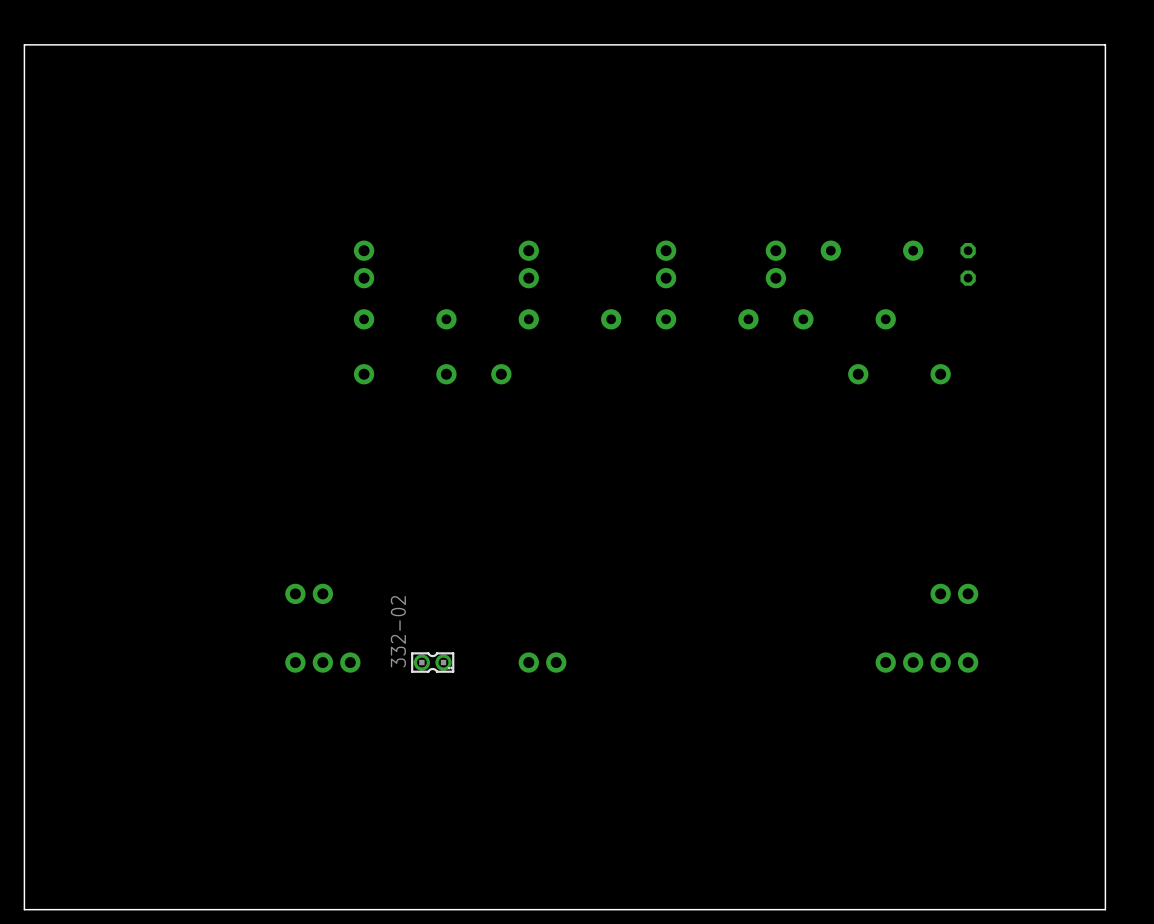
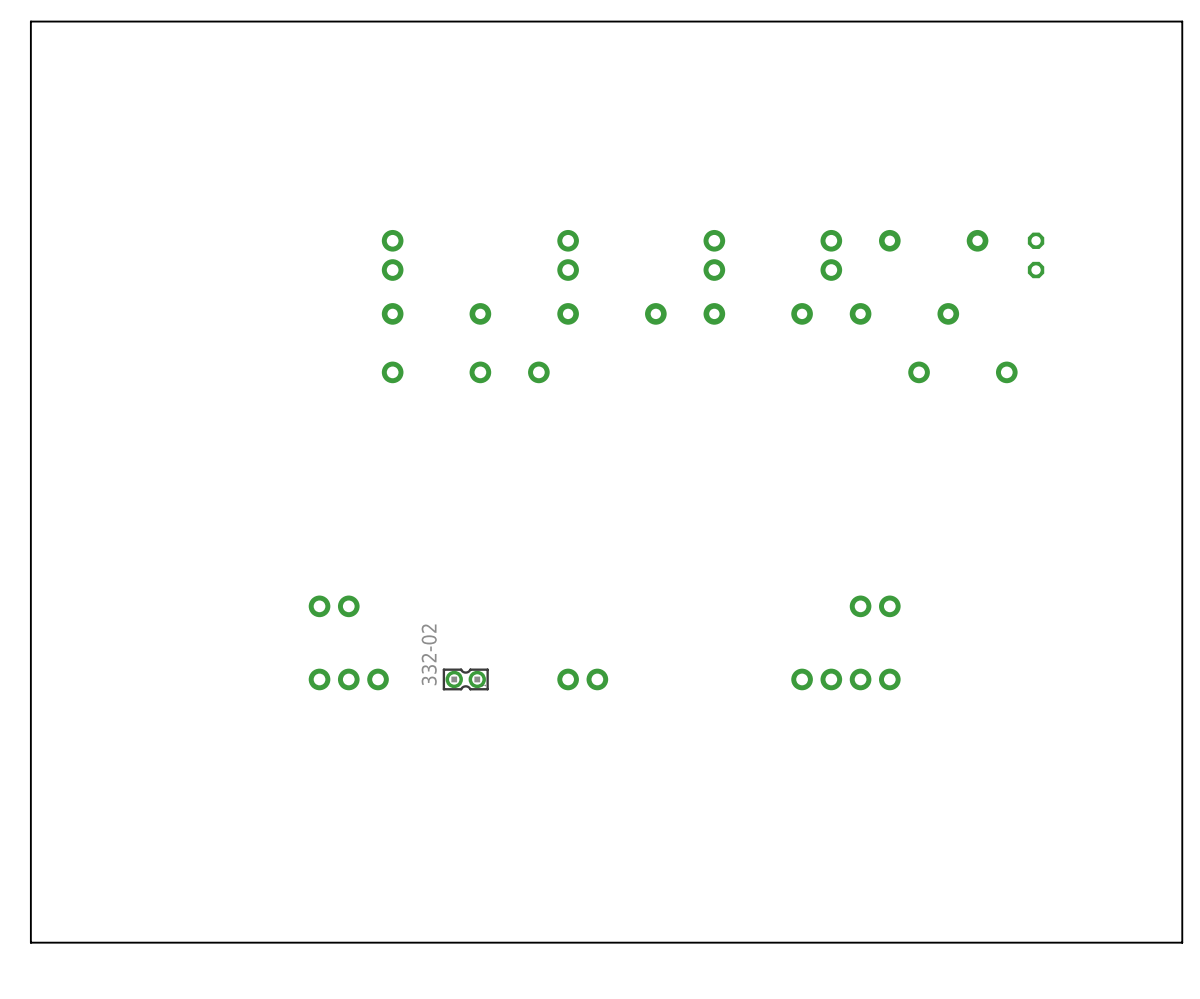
part position: (954, 593) -> (875, 606)
part position: (926, 662) -> (845, 679)

